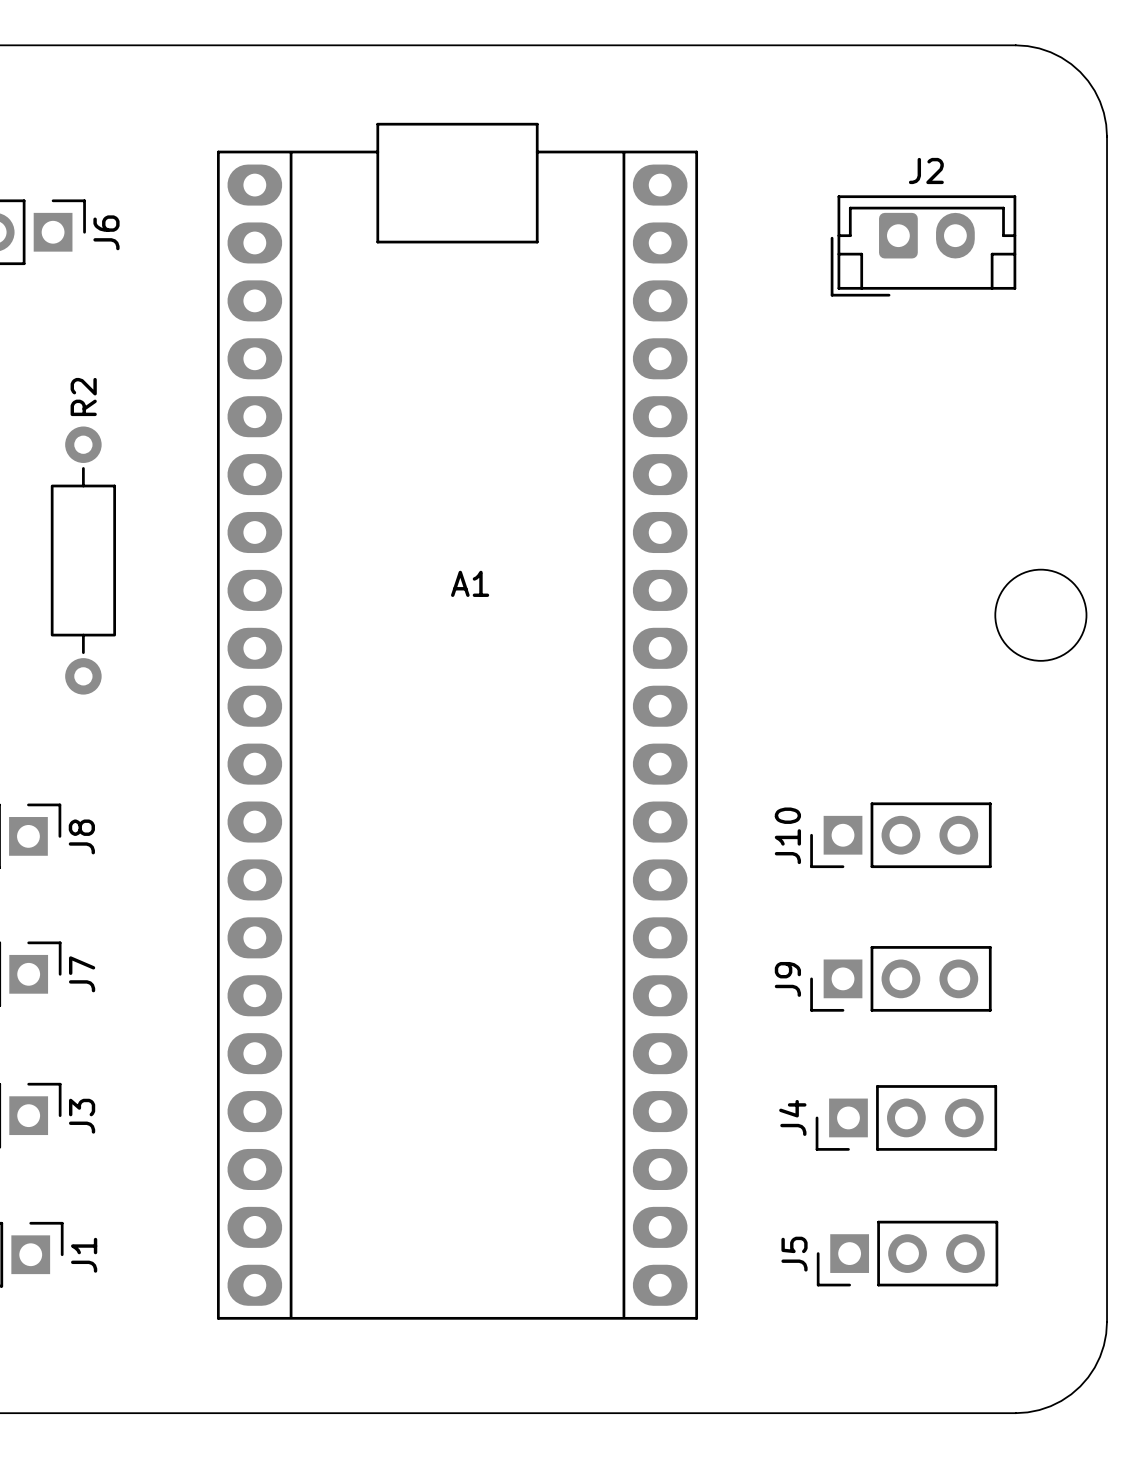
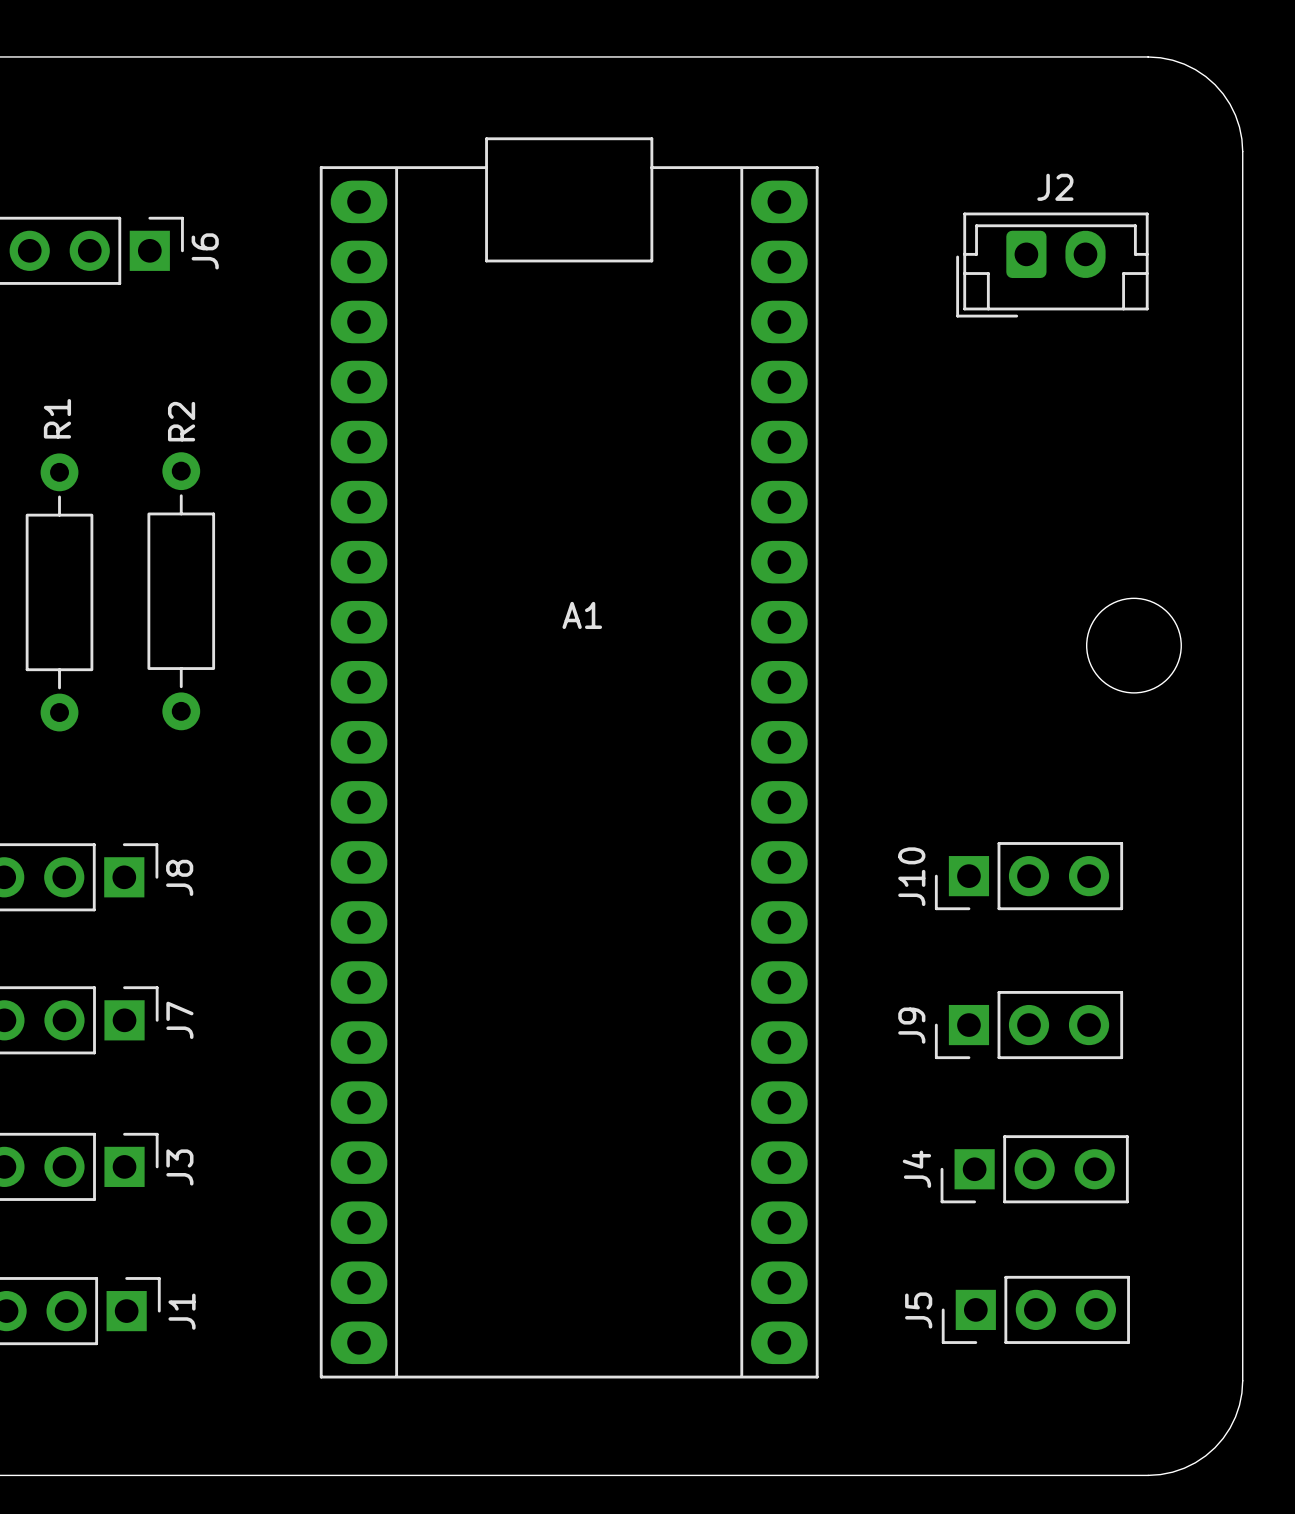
round board edge position: (1040, 615) -> (1133, 645)

